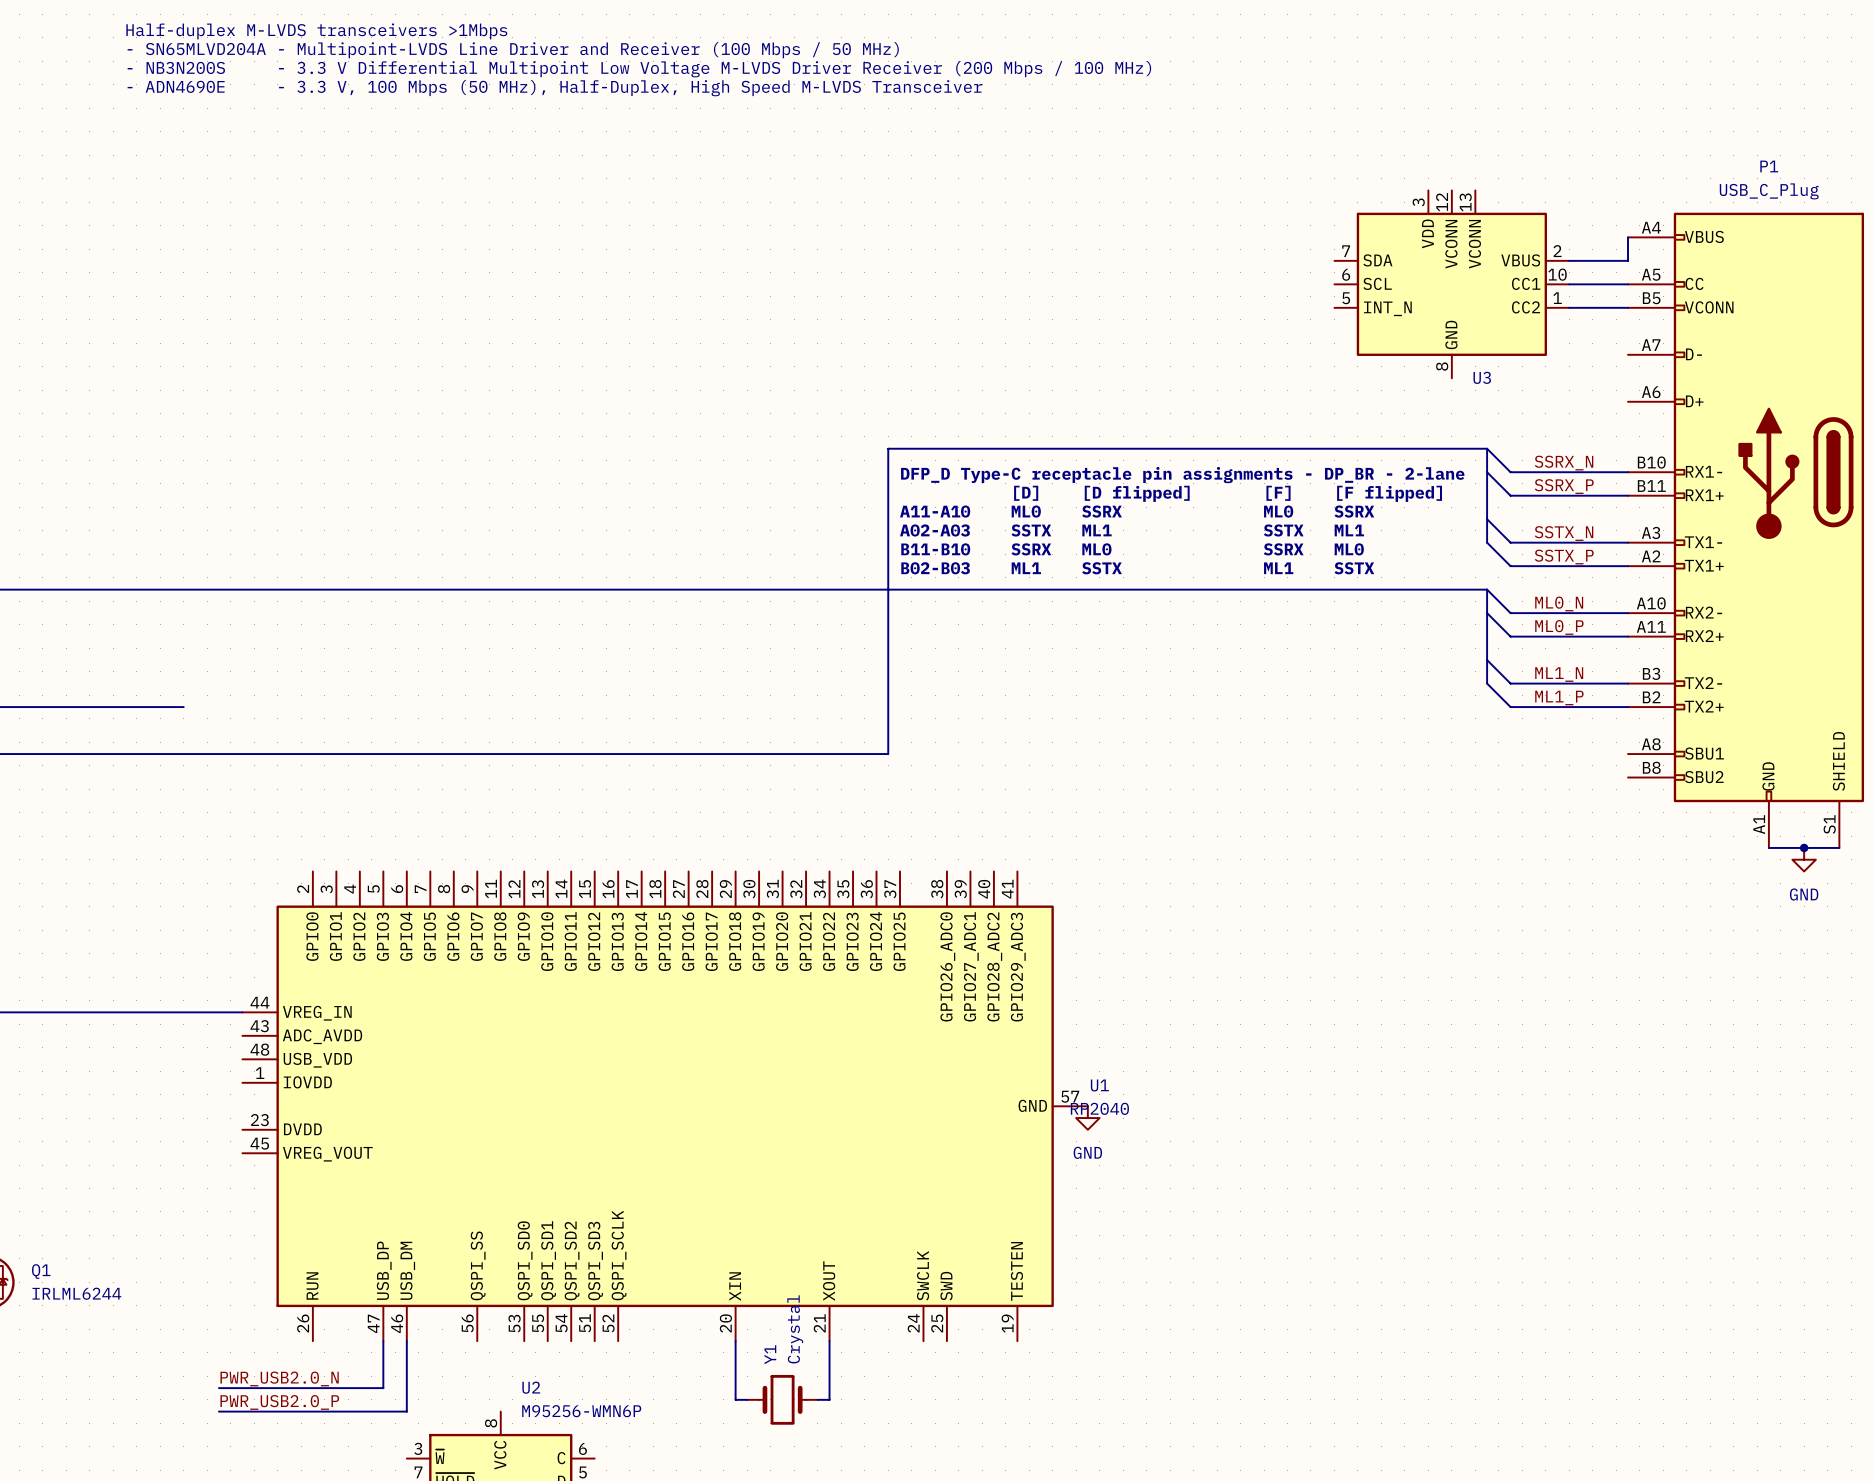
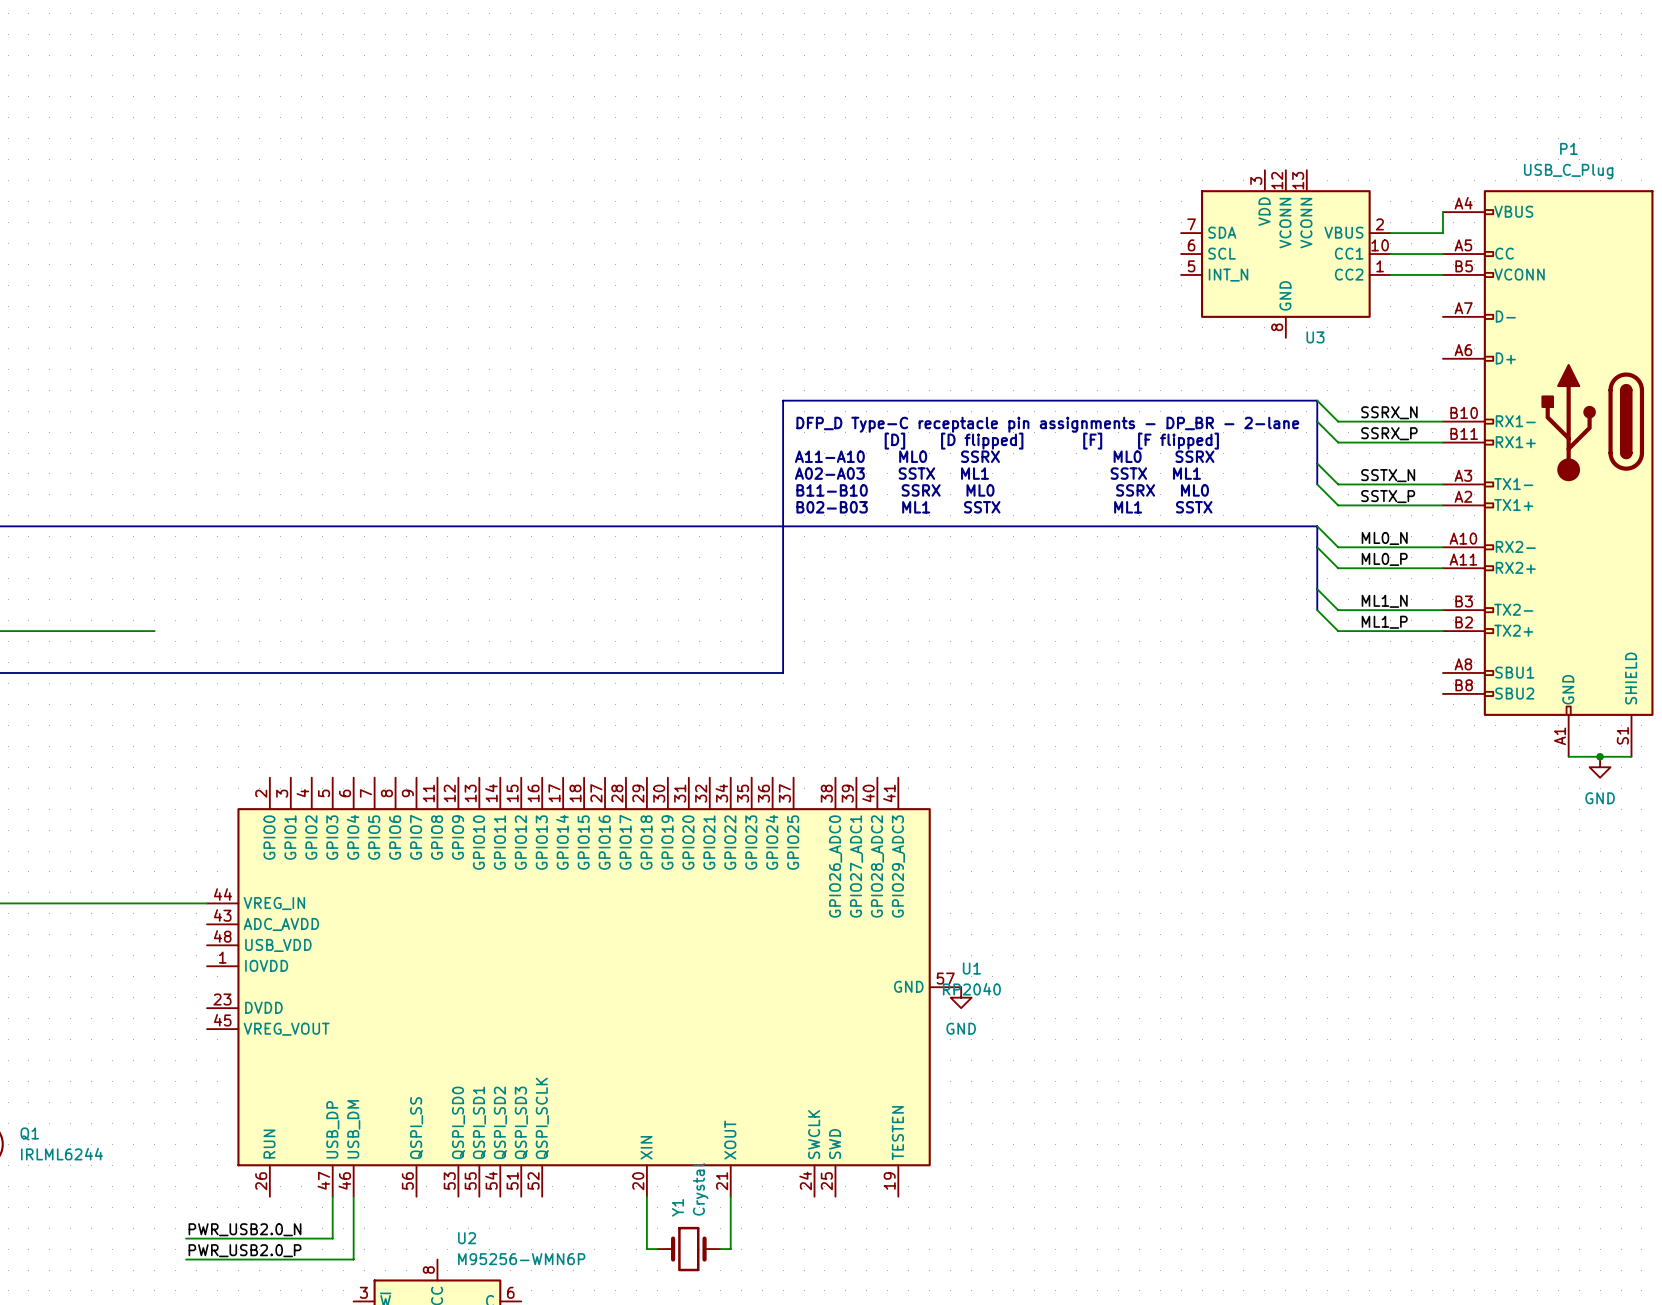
text: Half-duplex M-LVDS transceivers >1Mbps (316, 31) -> none
text: - SN65MLVD204A - Multipoint-LVDS Line Driver and Receiver (100 Mbps / 50 MHz) (513, 50) -> none
text: - NB3N200S - 3.3 V Differential Multipoint Low Voltage M-LVDS Driver Receiver (200 Mbps / 100 MHz) (639, 69) -> none
text: - ADN4690E - 3.3 V, 100 Mbps (50 MHz), Half-Duplex, High Speed M-LVDS Transceiver (554, 88) -> none

